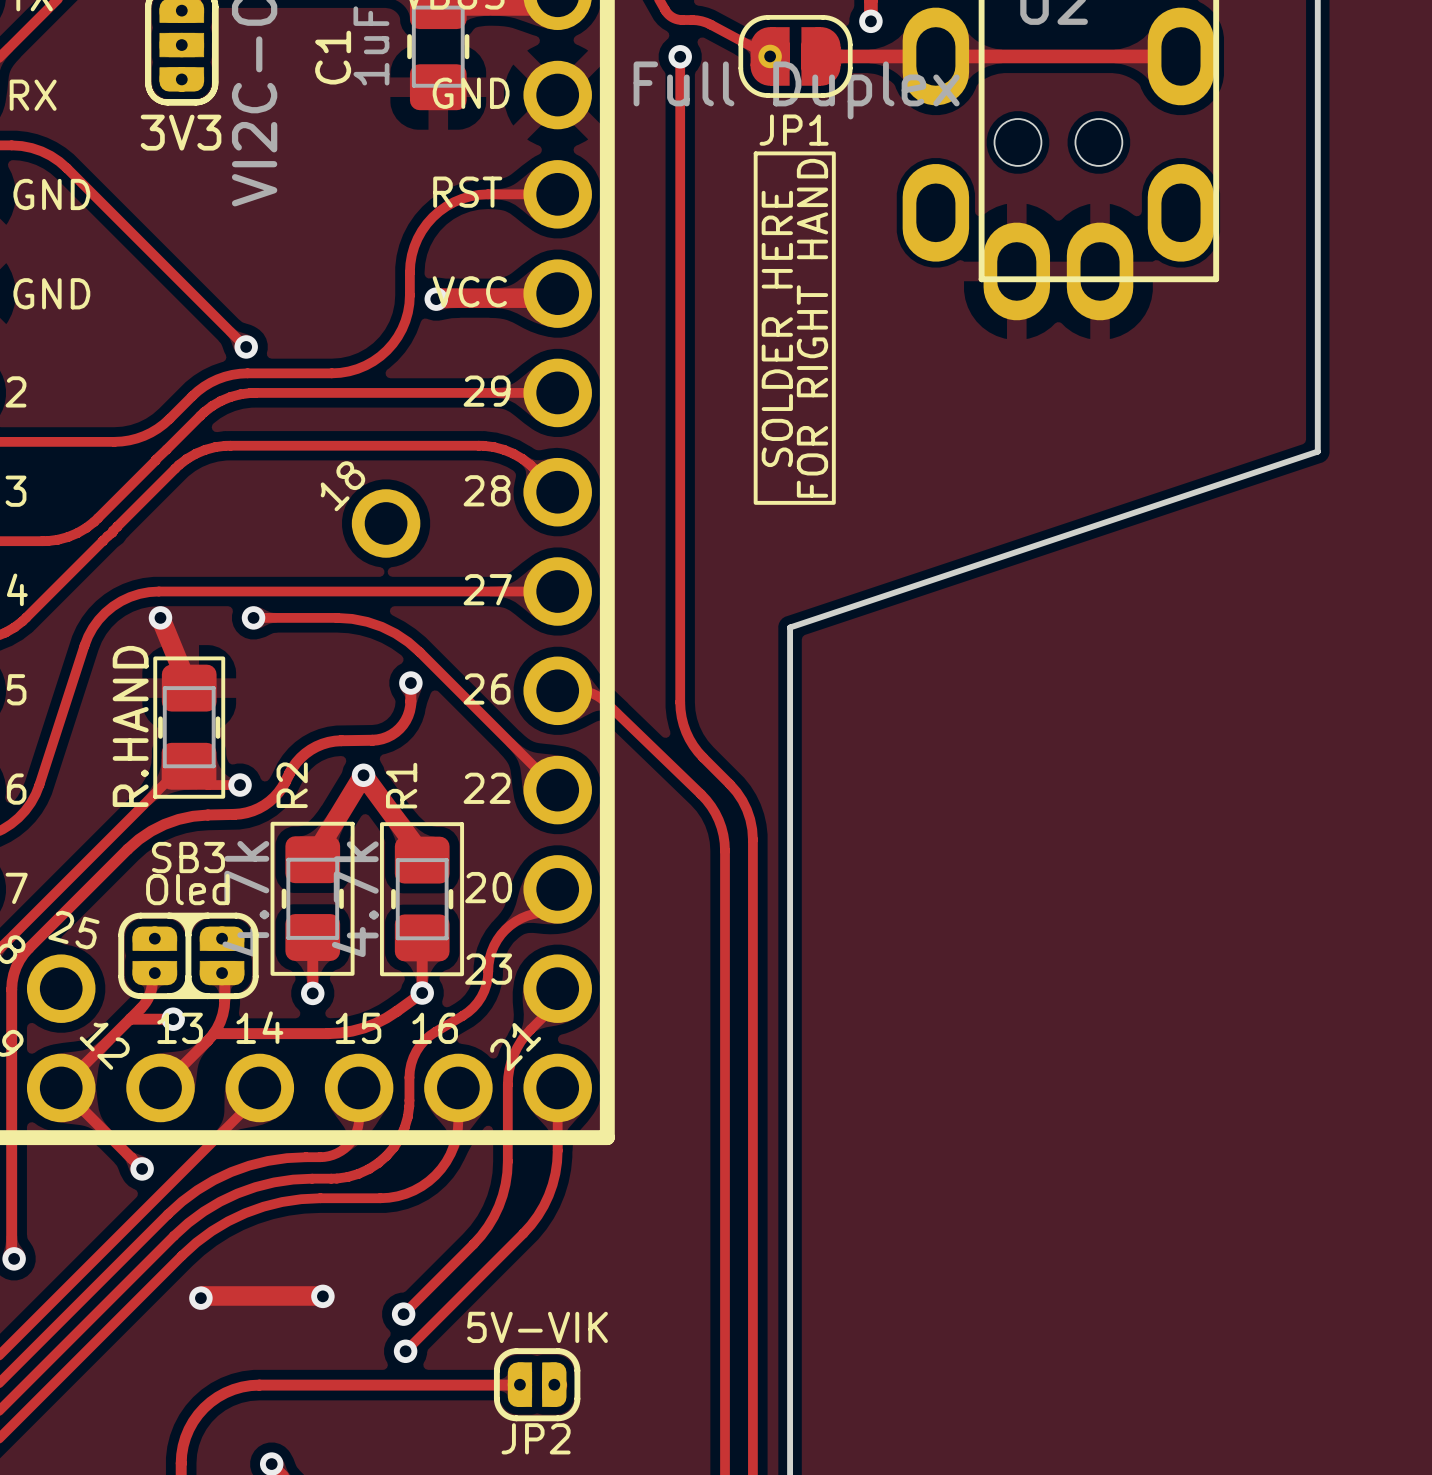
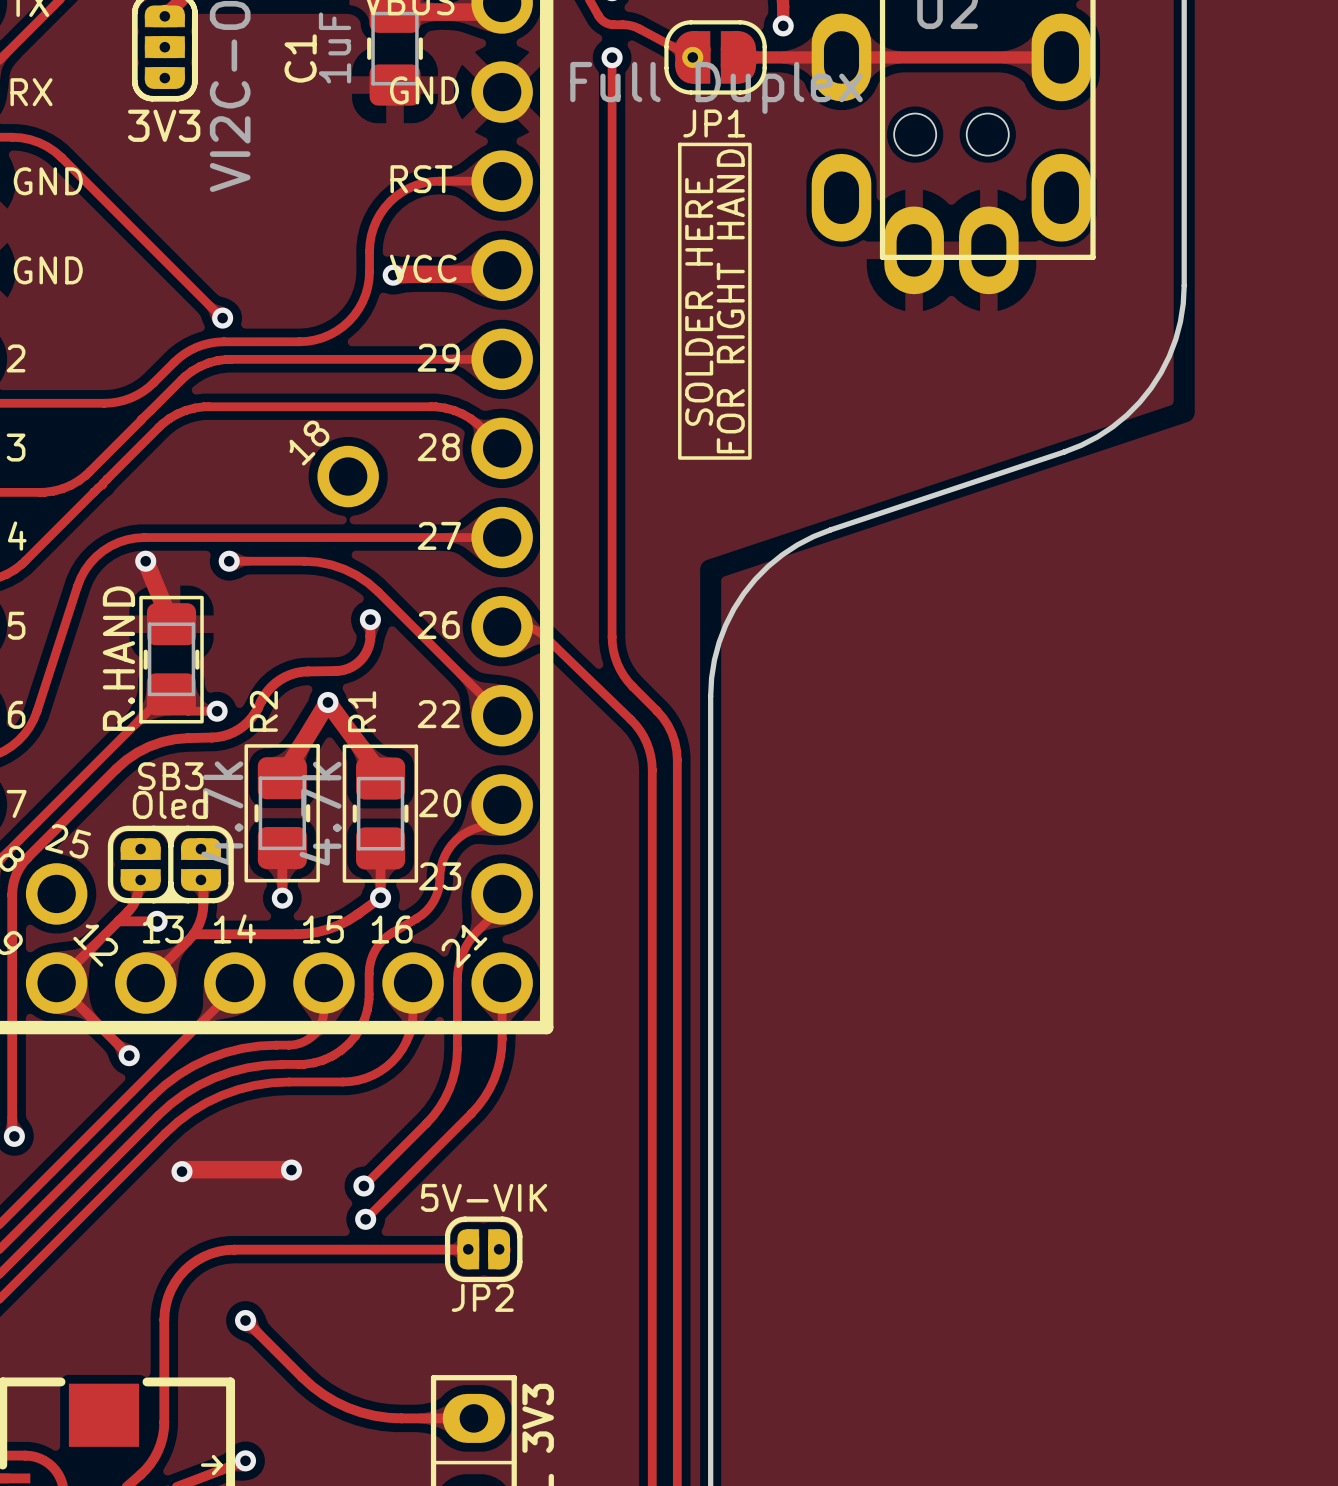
board edge: (1317, 310) (1317, 451) (1184, 496) -> (1184, 285) (1183, 303) (1175, 339) (1169, 356) (1151, 388) (1139, 402) (1112, 426) (1081, 445) (1064, 451)
board edge: (923, 582) (790, 627) (790, 768) -> (830, 529) (797, 544) (782, 554) (768, 566) (743, 593) (733, 609) (719, 642) (711, 678) (710, 696)

